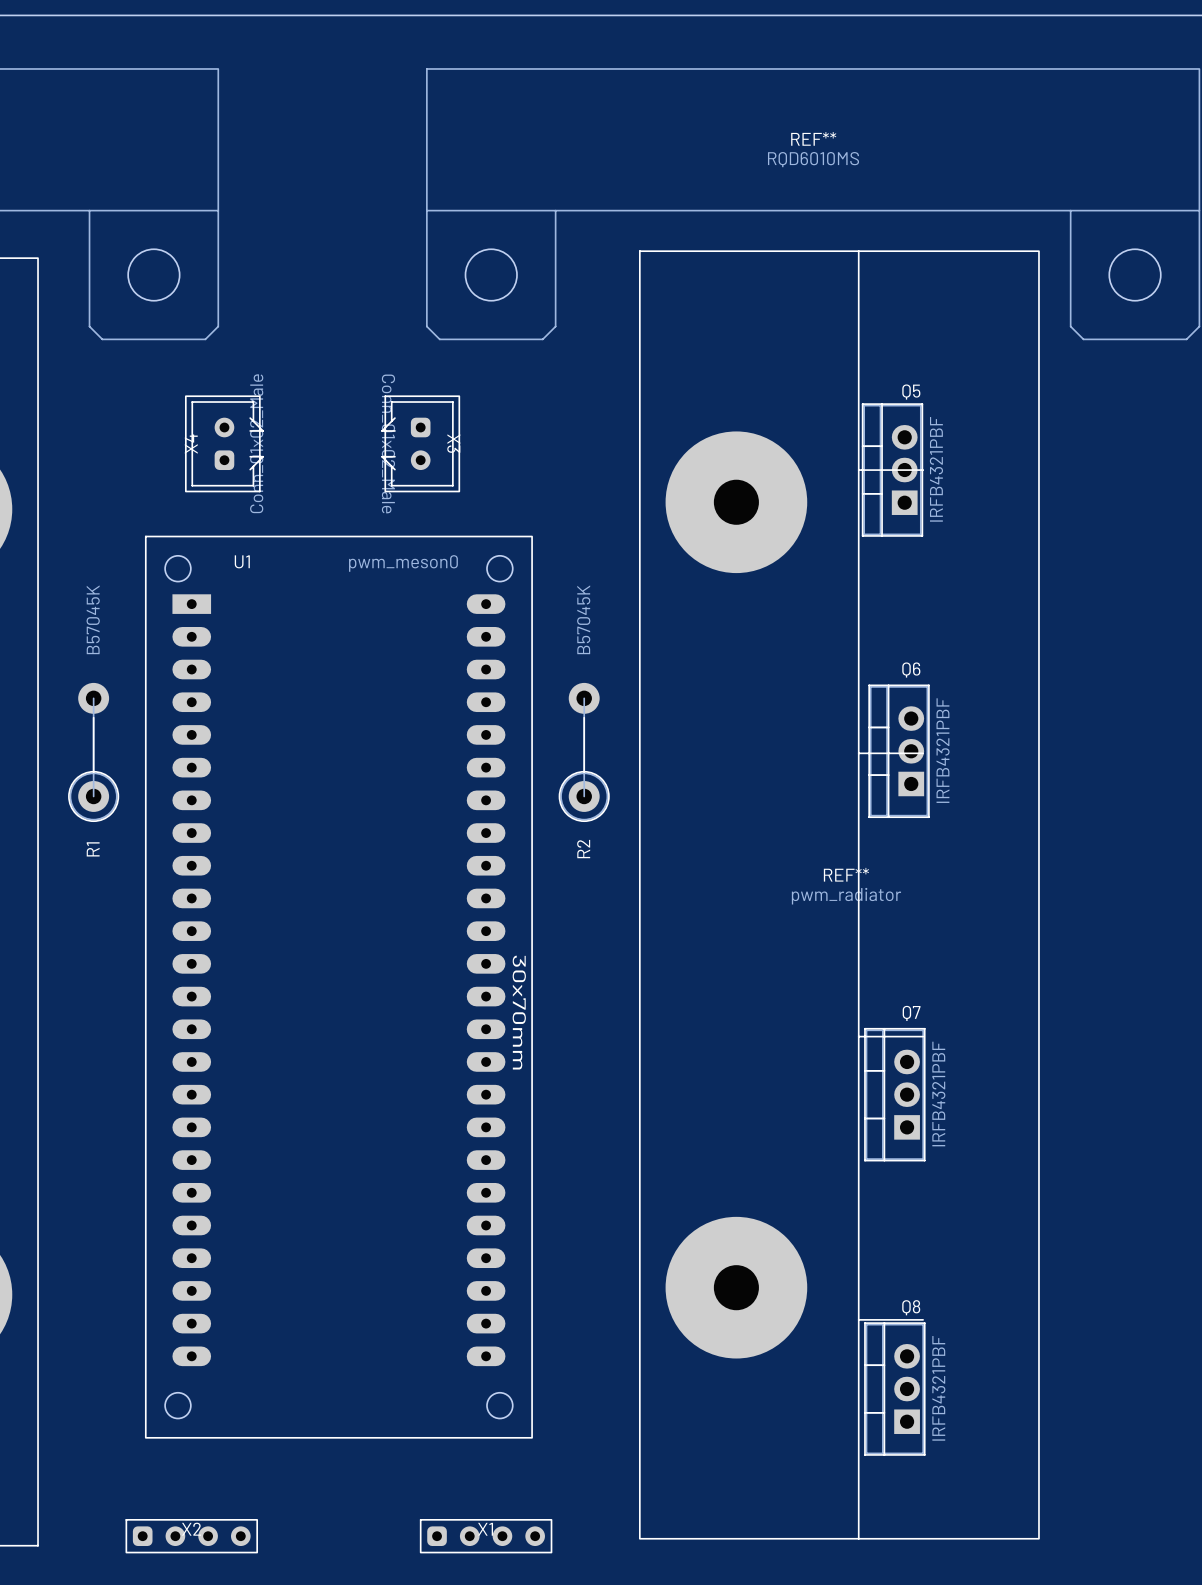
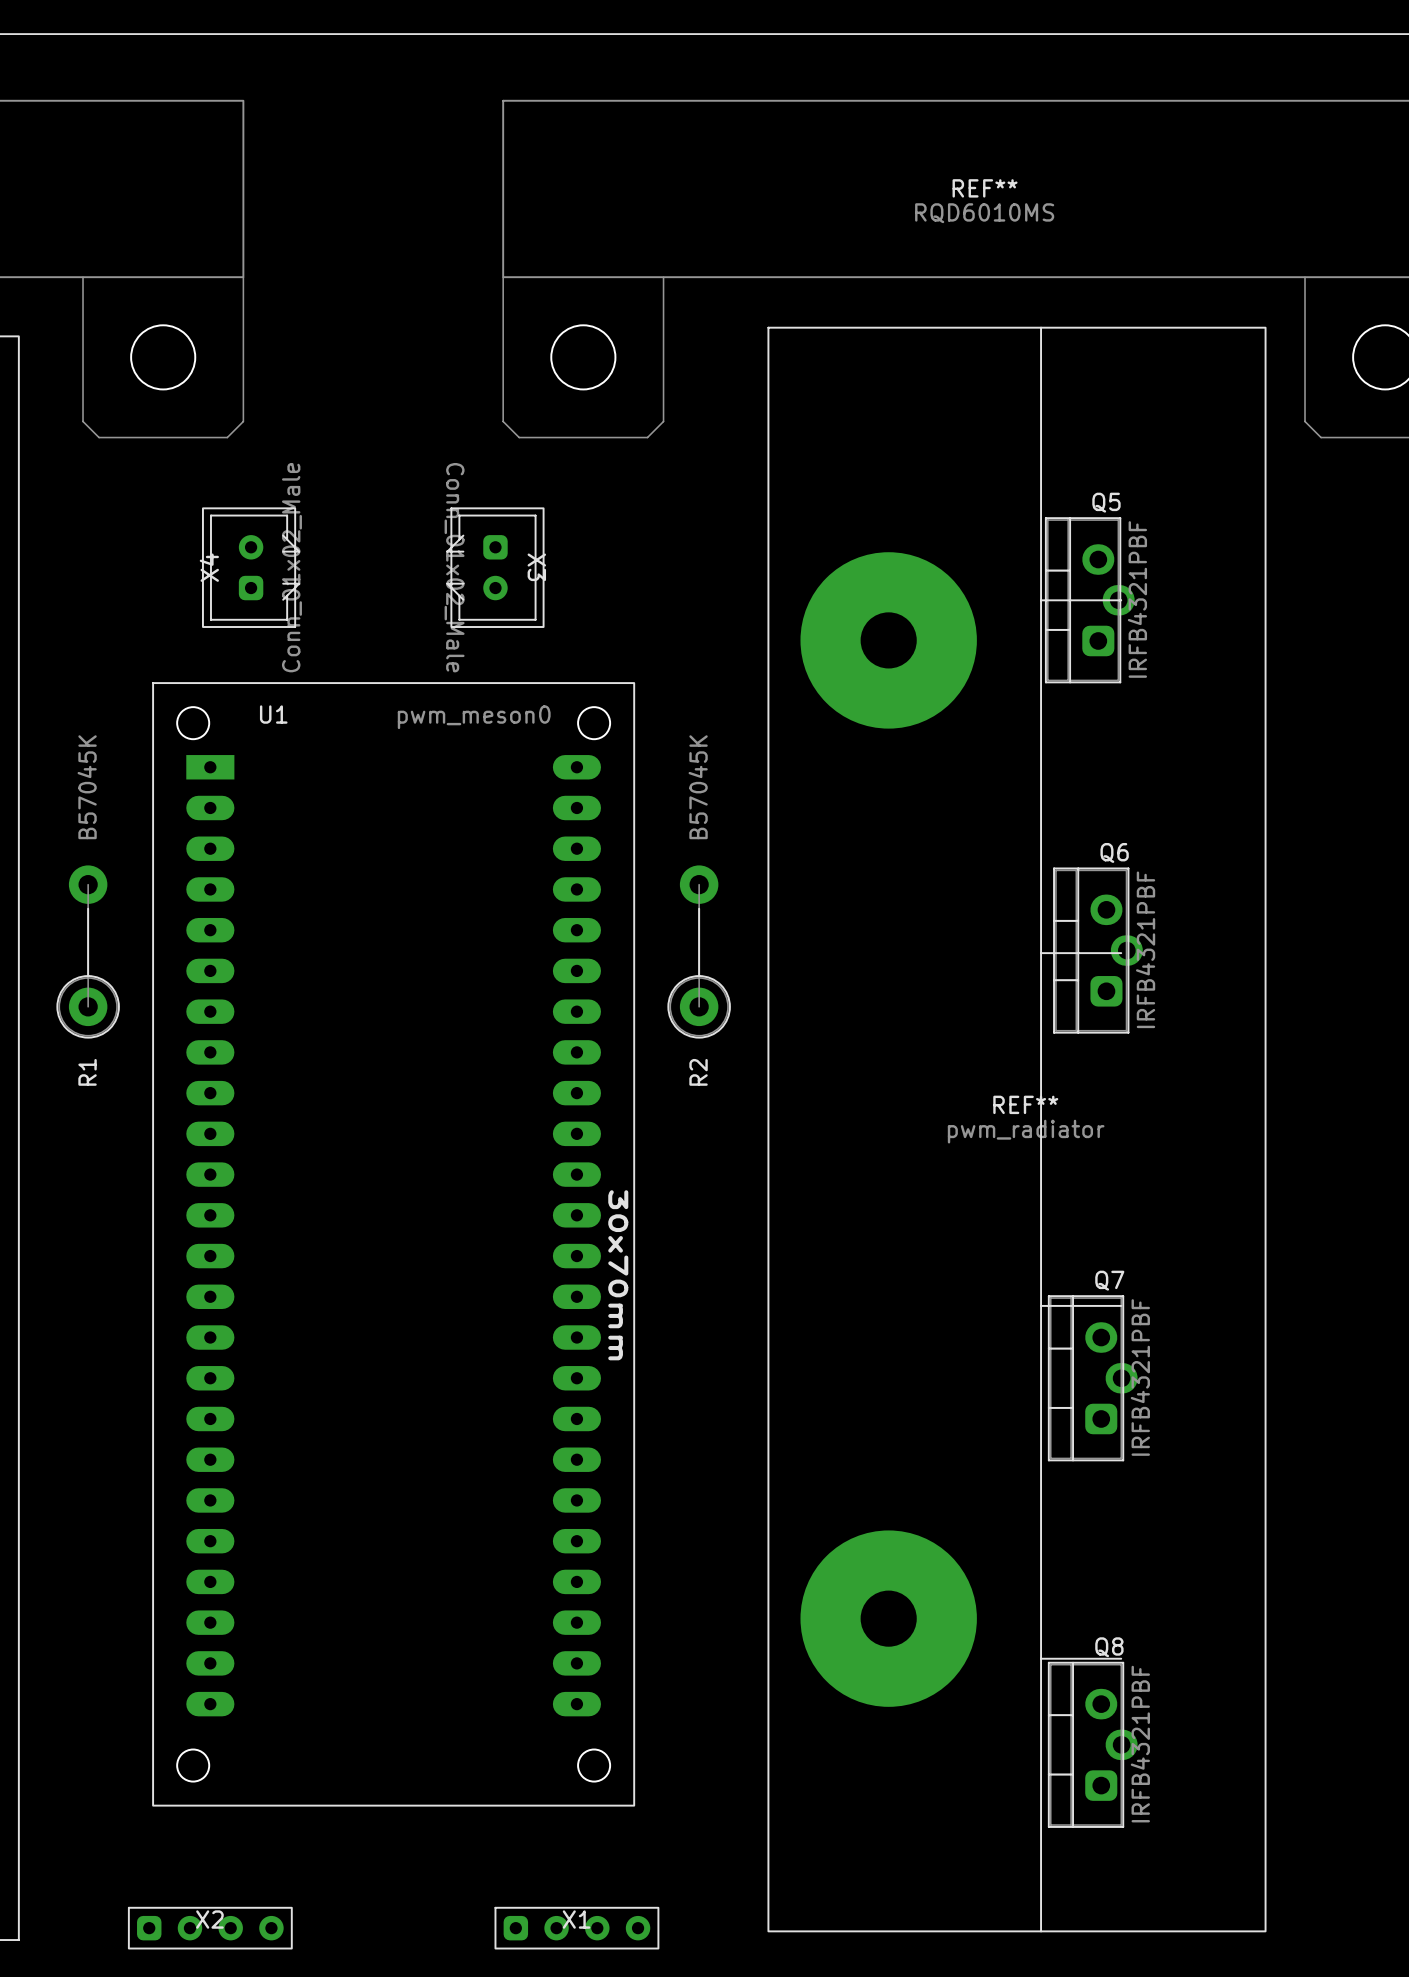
Q5 footprint: [861, 403, 924, 537] -> [1044, 517, 1135, 684]
Q6 footprint: [868, 684, 930, 818] -> [1053, 867, 1143, 1034]
Q7 footprint: [864, 1027, 926, 1162] -> [1047, 1295, 1138, 1462]
Q8 footprint: [864, 1322, 926, 1456] -> [1047, 1661, 1138, 1828]

